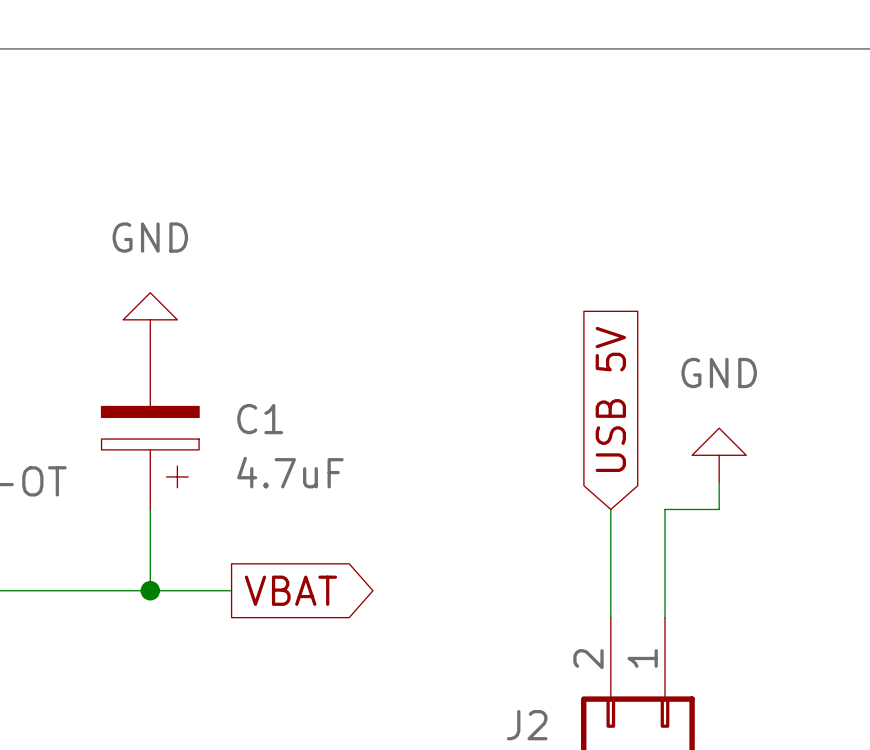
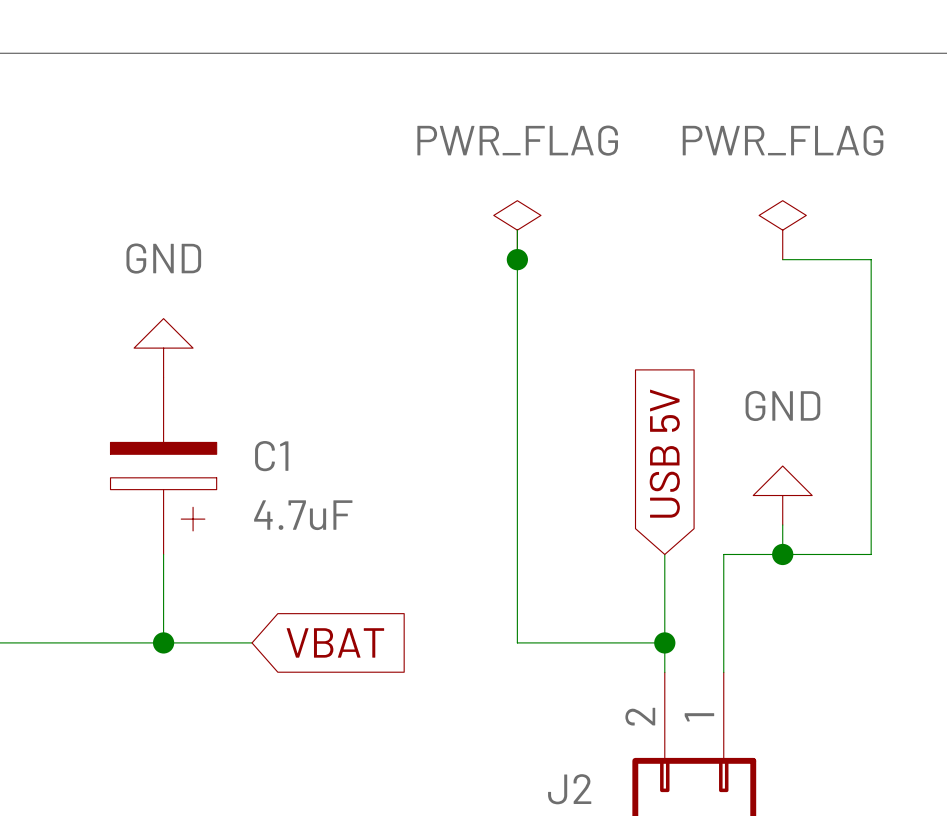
wire: none -> (517, 230) (517, 642) (664, 642)
power symbol: none -> PWR_FLAG (517, 230)
power symbol: none -> PWR_FLAG (782, 230)
junction: none -> (517, 259)
wire: none -> (782, 259) (871, 259) (871, 554) (782, 554)
junction: none -> (782, 554)
global label shape: output (290, 590) -> input (335, 642)
junction: none -> (664, 642)

